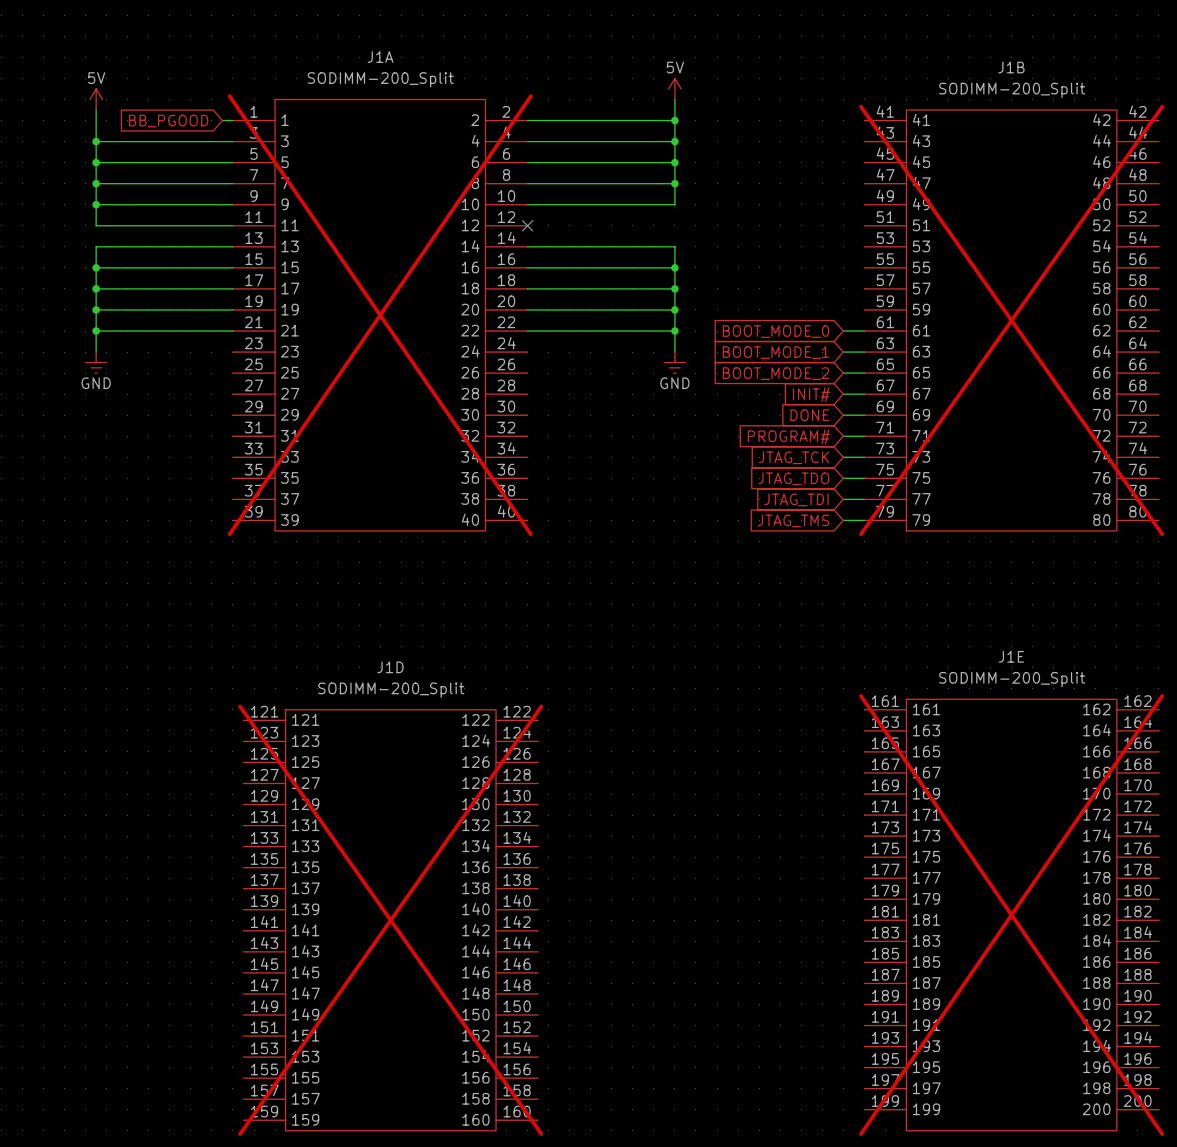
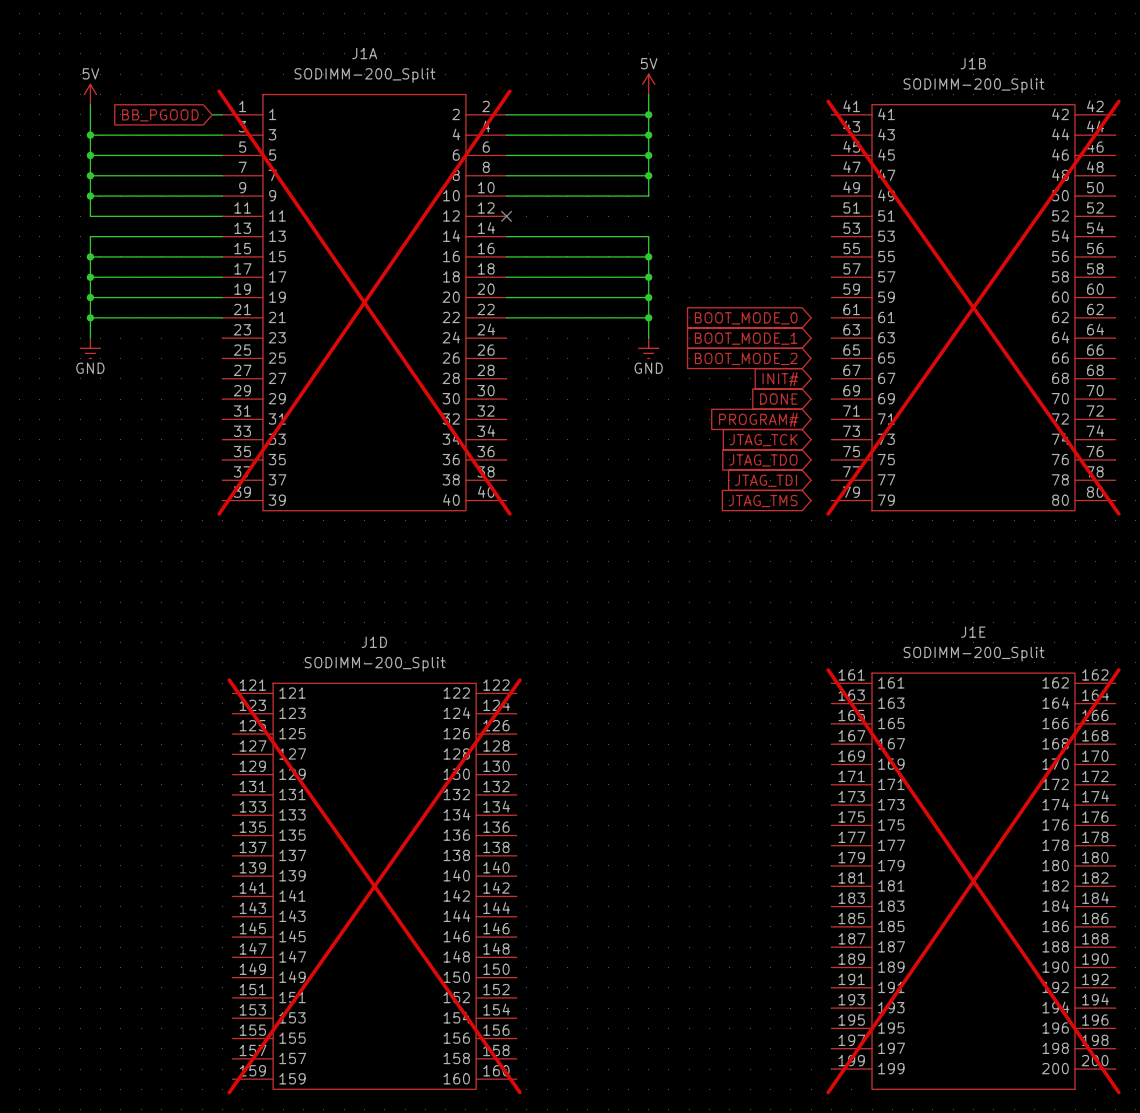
wire: (843, 331) (864, 331) -> none
wire: (843, 352) (864, 352) -> none
wire: (843, 373) (864, 373) -> none
wire: (843, 394) (864, 394) -> none
wire: (843, 415) (864, 415) -> none
wire: (843, 436) (864, 436) -> none
wire: (843, 457) (864, 457) -> none
wire: (843, 478) (864, 478) -> none
wire: (843, 499) (864, 499) -> none
wire: (843, 520) (864, 520) -> none

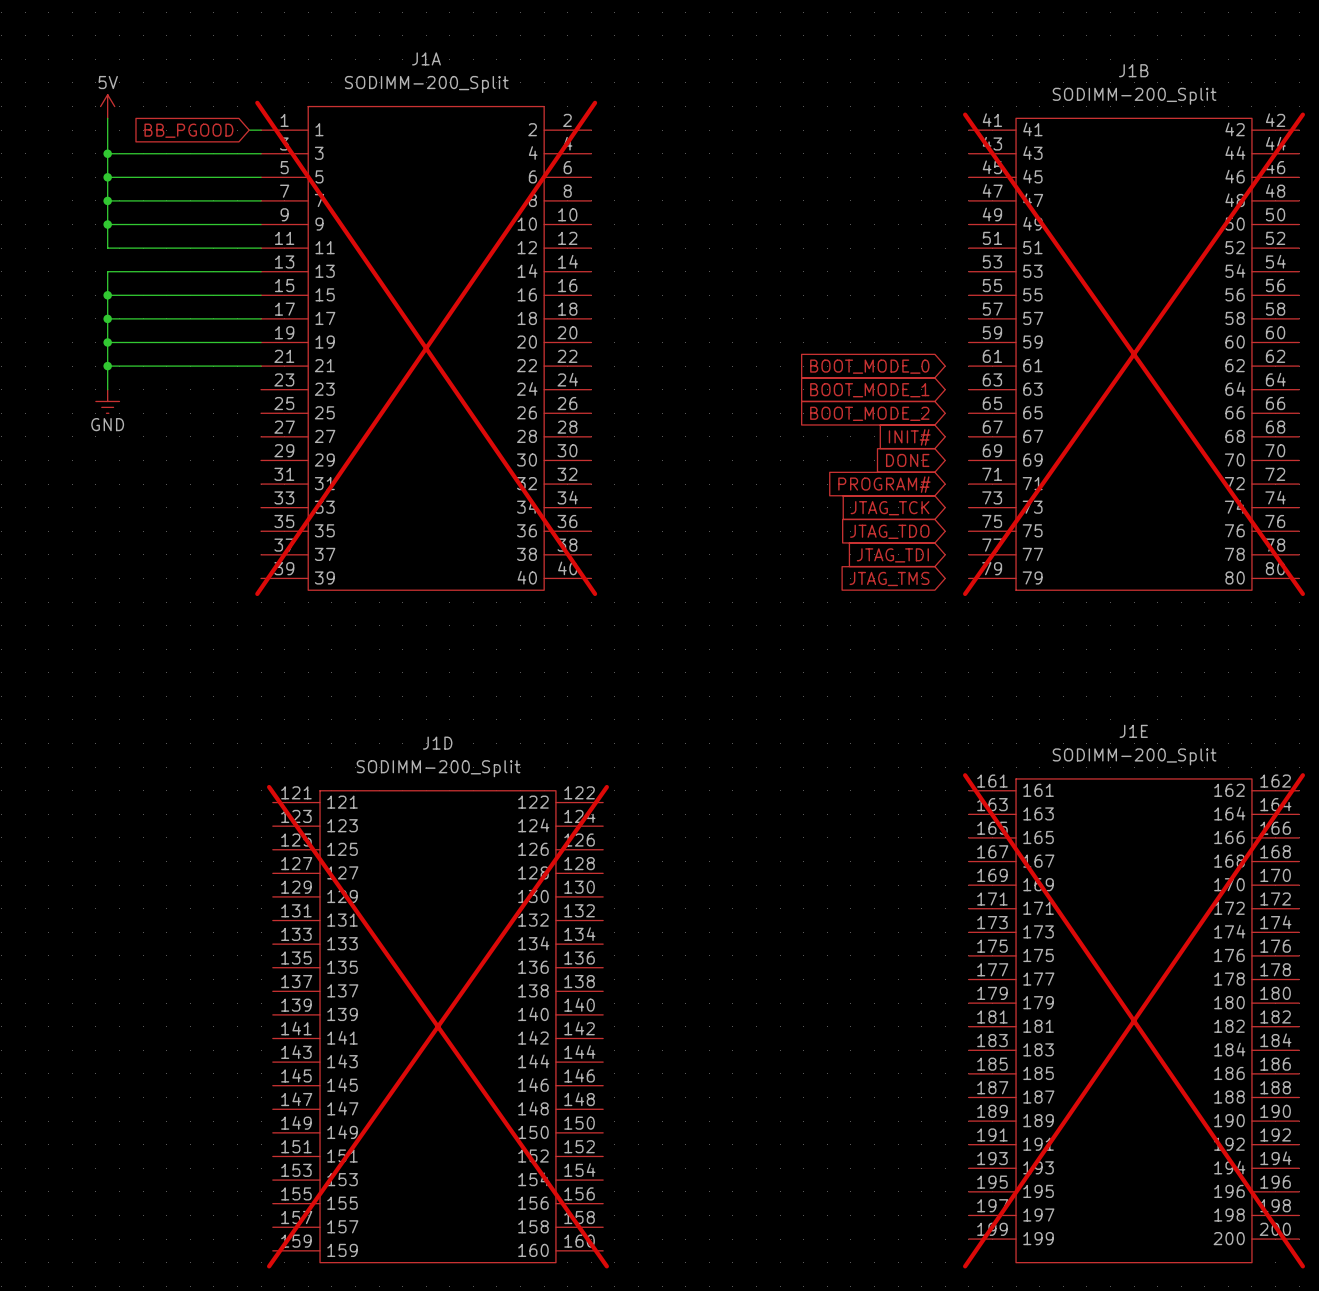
power symbol: 5V (648, 84) -> none
wire: (648, 94) (648, 196) (506, 196) -> none
wire: (506, 114) (648, 114) -> none
junction: (648, 114) -> none
wire: (506, 135) (648, 135) -> none
junction: (648, 135) -> none
wire: (506, 155) (648, 155) -> none
junction: (648, 155) -> none
wire: (506, 175) (648, 175) -> none
junction: (648, 175) -> none
no-connect mark: (506, 216) -> none
wire: (506, 236) (648, 236) (648, 338) -> none
wire: (506, 256) (648, 256) -> none
junction: (648, 256) -> none
wire: (506, 277) (648, 277) -> none
junction: (648, 277) -> none
wire: (506, 297) (648, 297) -> none
junction: (648, 297) -> none
wire: (506, 317) (648, 317) -> none
junction: (648, 317) -> none
power symbol: GND (648, 348) -> none

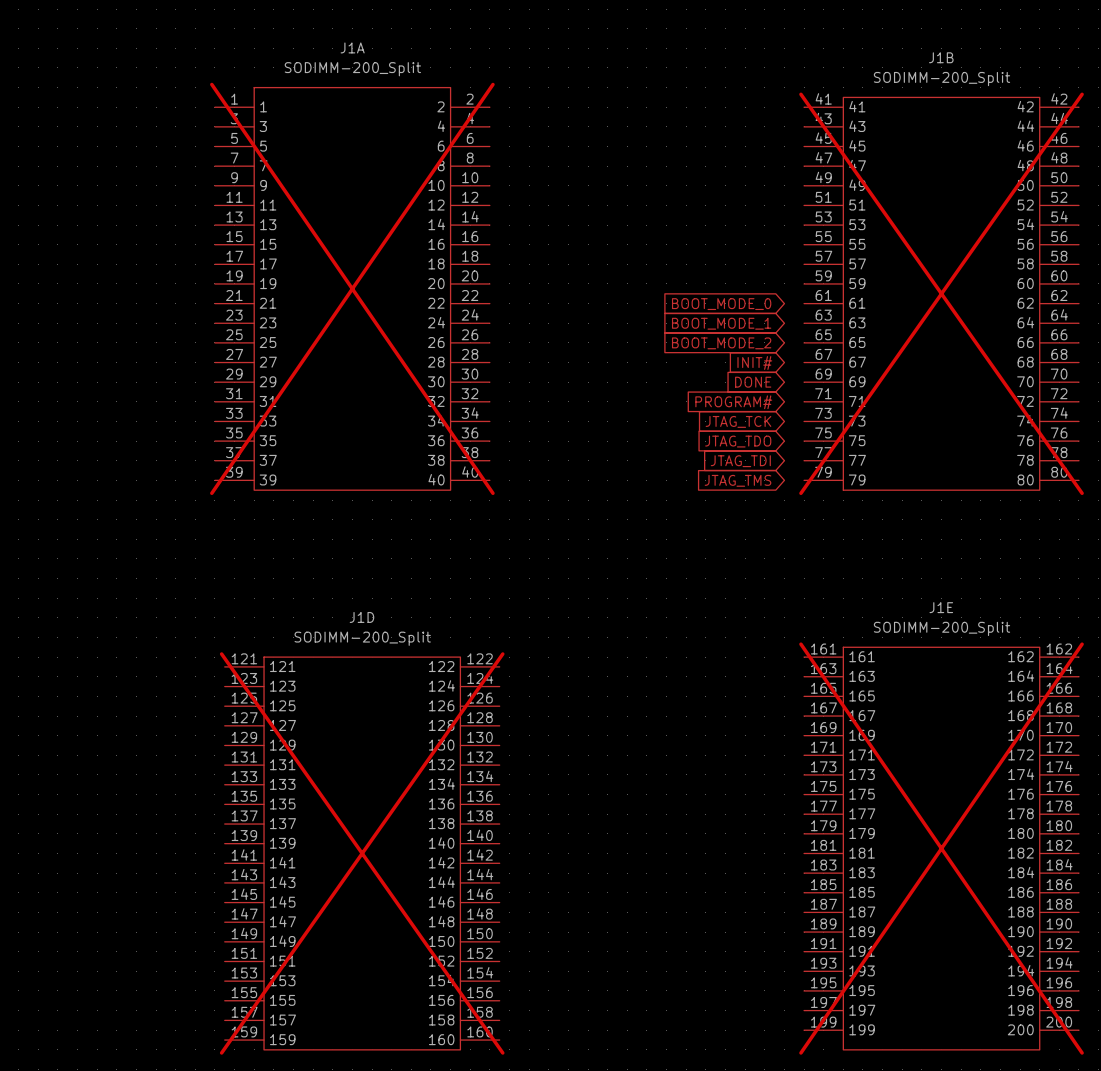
power symbol: 5V (107, 106) -> none
wire: (107, 118) (107, 248) (261, 248) -> none
global label: BB_PGOOD (188, 130) -> none
wire: (249, 130) (261, 130) -> none
wire: (107, 153) (261, 153) -> none
junction: (107, 153) -> none
wire: (107, 177) (261, 177) -> none
junction: (107, 177) -> none
wire: (107, 200) (261, 200) -> none
junction: (107, 200) -> none
wire: (107, 224) (261, 224) -> none
junction: (107, 224) -> none
wire: (261, 271) (107, 271) (107, 389) -> none
wire: (107, 295) (261, 295) -> none
junction: (107, 295) -> none
wire: (107, 318) (261, 318) -> none
junction: (107, 318) -> none
wire: (107, 342) (261, 342) -> none
junction: (107, 342) -> none
wire: (107, 366) (261, 366) -> none
junction: (107, 366) -> none
power symbol: GND (107, 401) -> none

